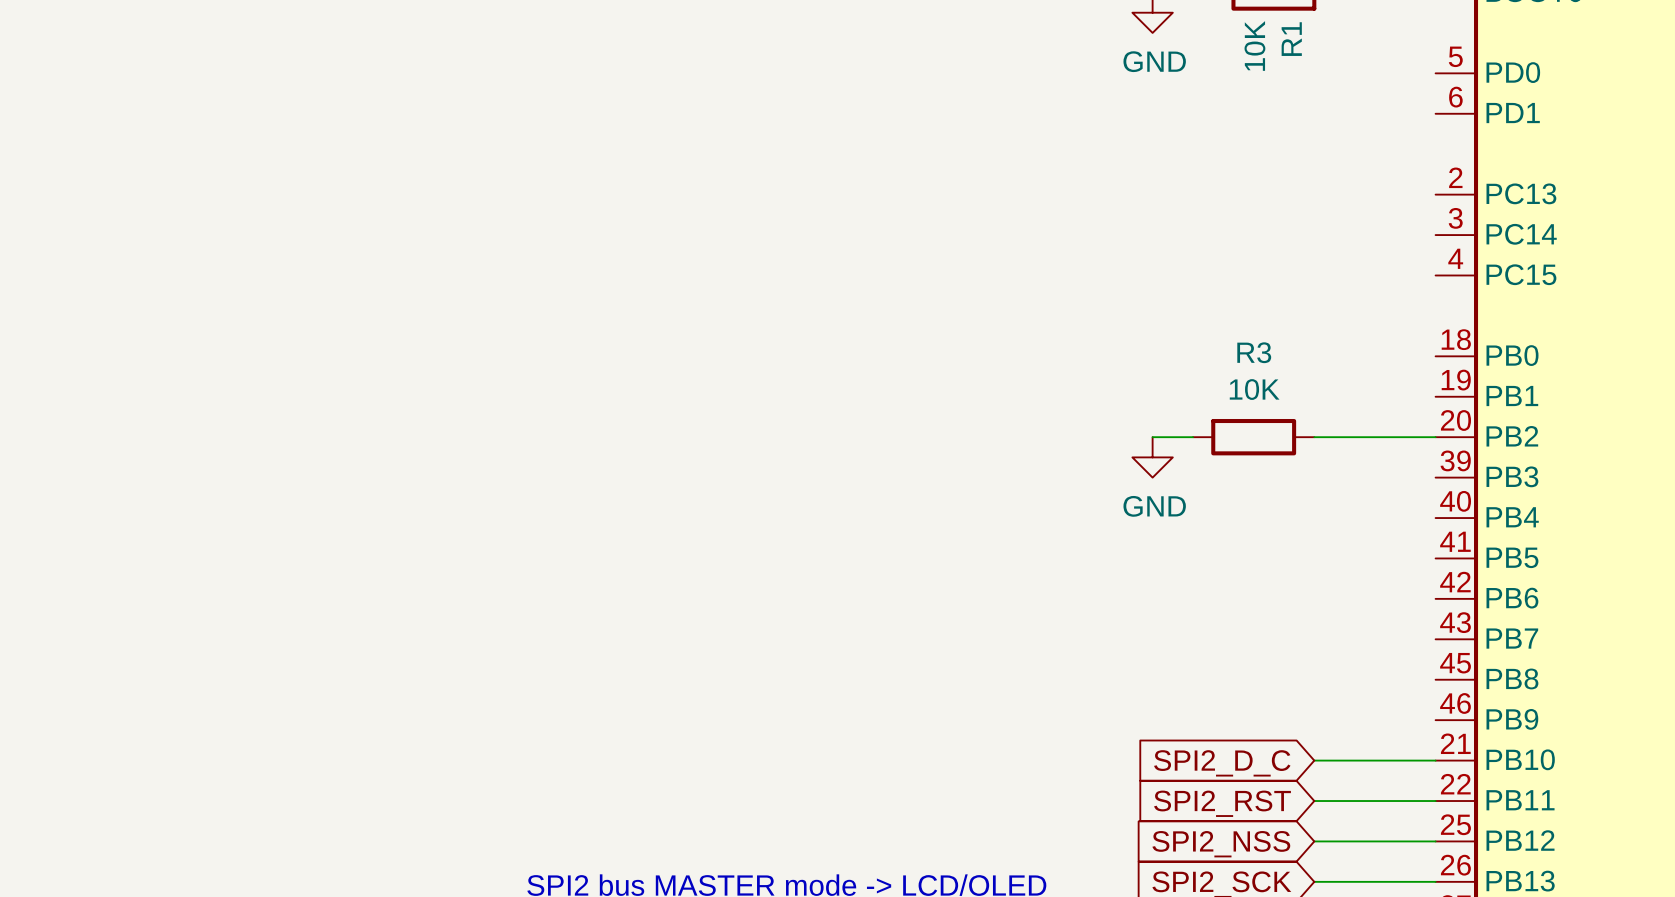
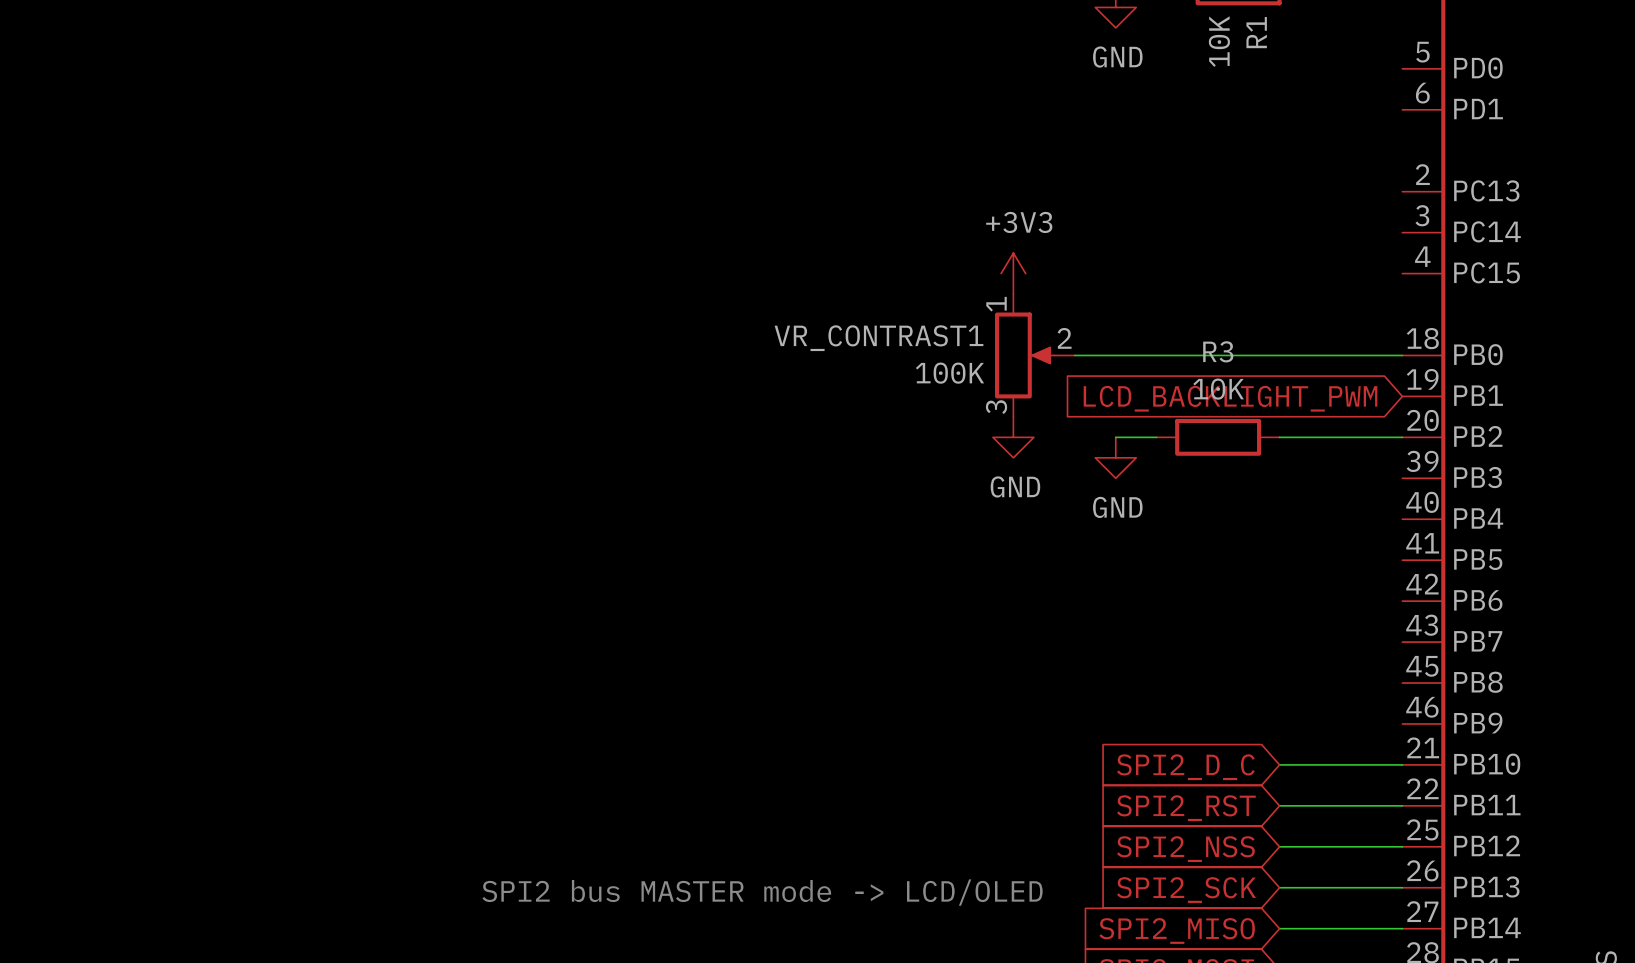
power symbol: none -> +3V3 (1013, 273)
VR_CONTRAST1: none -> 100K (1034, 355)
wire: none -> (1074, 355) (1402, 355)
global label: none -> LCD_BACKLIGHT_PWM (1230, 398)
power symbol: none -> GND (1013, 437)

